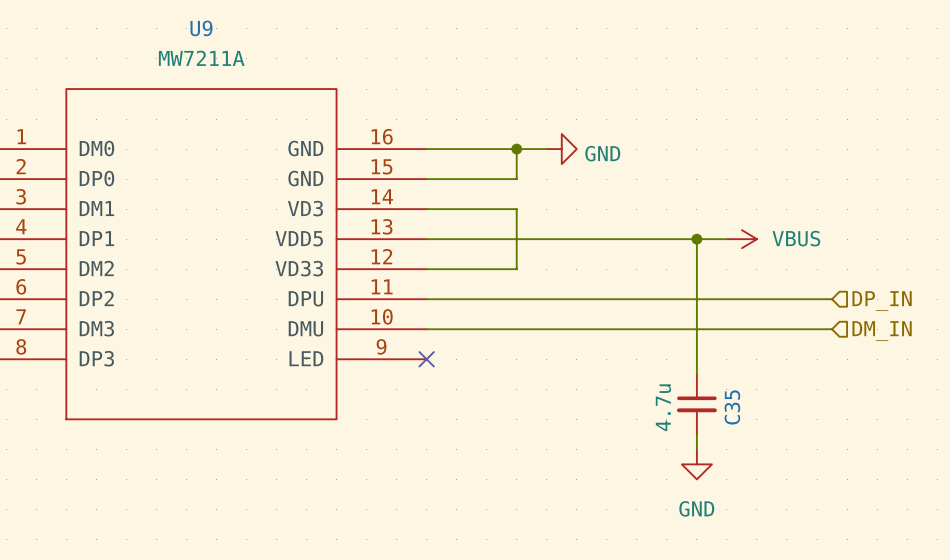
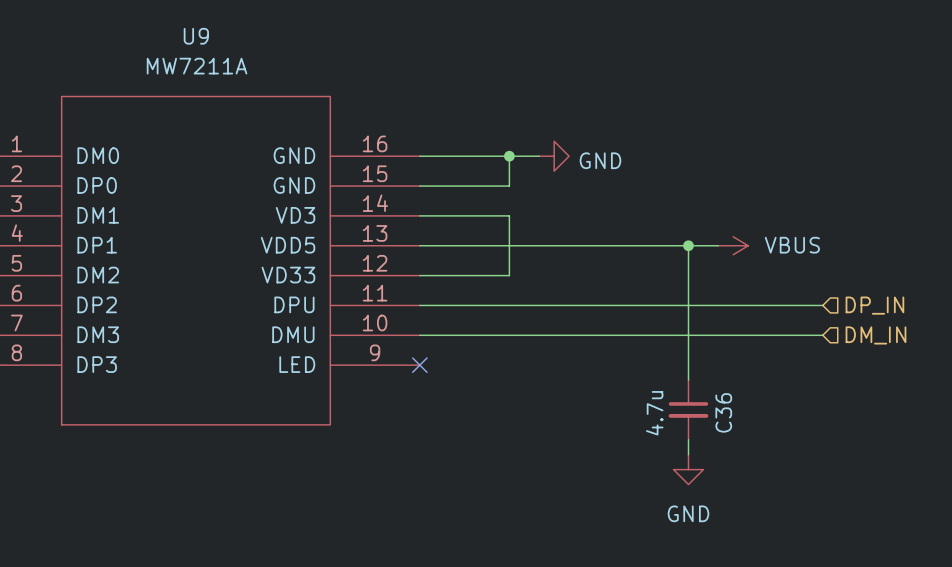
C35 name: C35 (732, 407) -> C36 (723, 412)

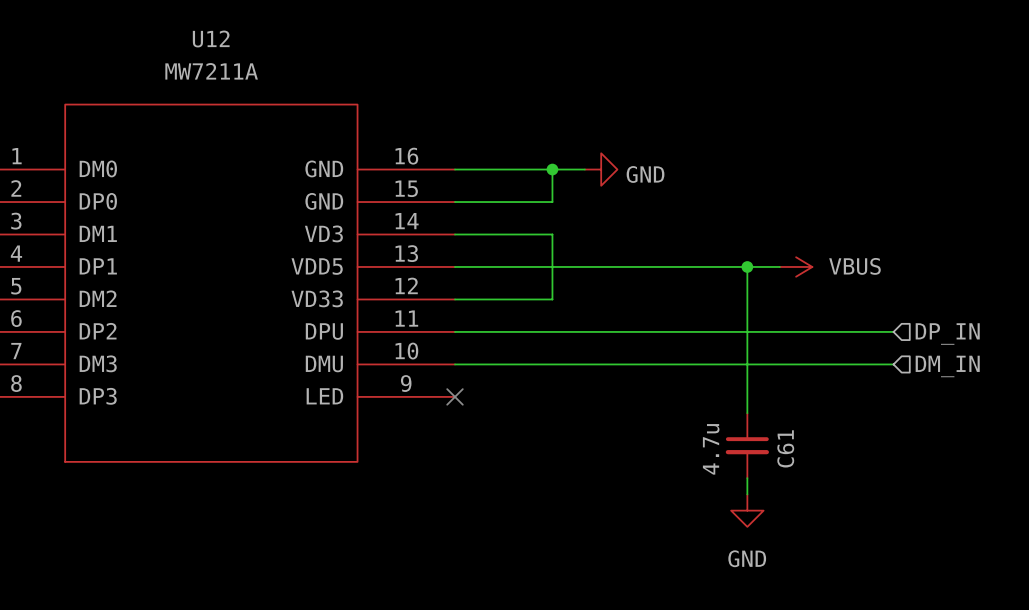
U9 name: U9 (196, 36) -> U12 (211, 38)
C36 name: C36 (723, 412) -> C61 (785, 448)

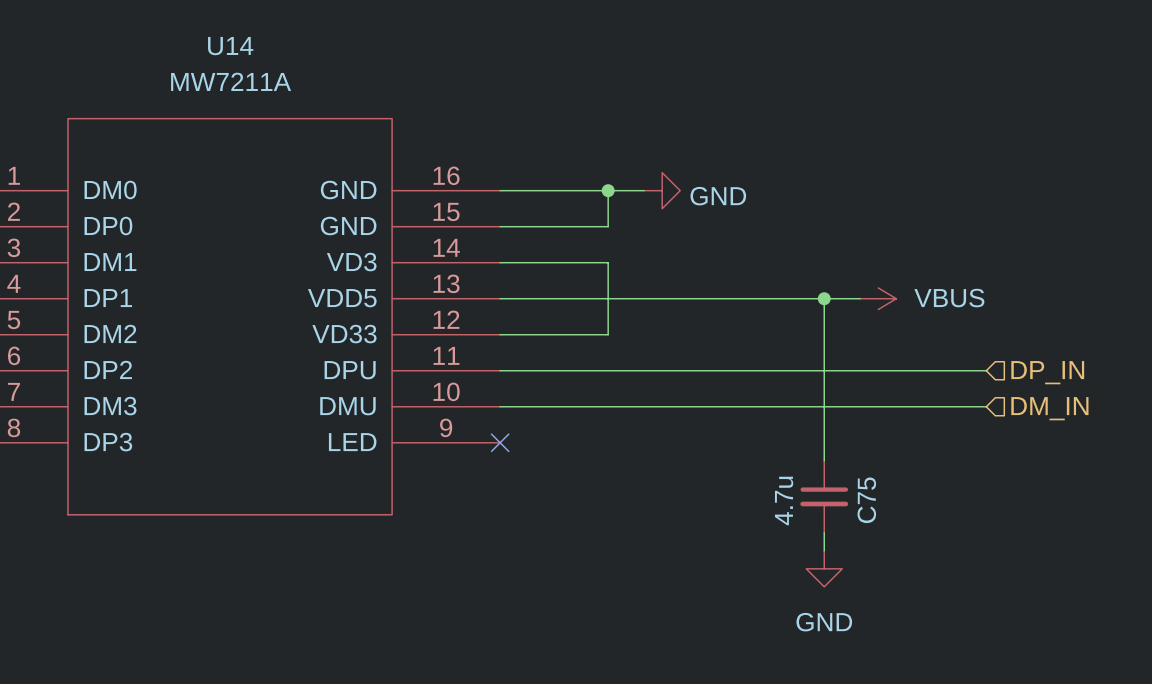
U12 name: U12 (211, 38) -> U14 (230, 46)
C61 name: C61 (785, 448) -> C75 (866, 500)

